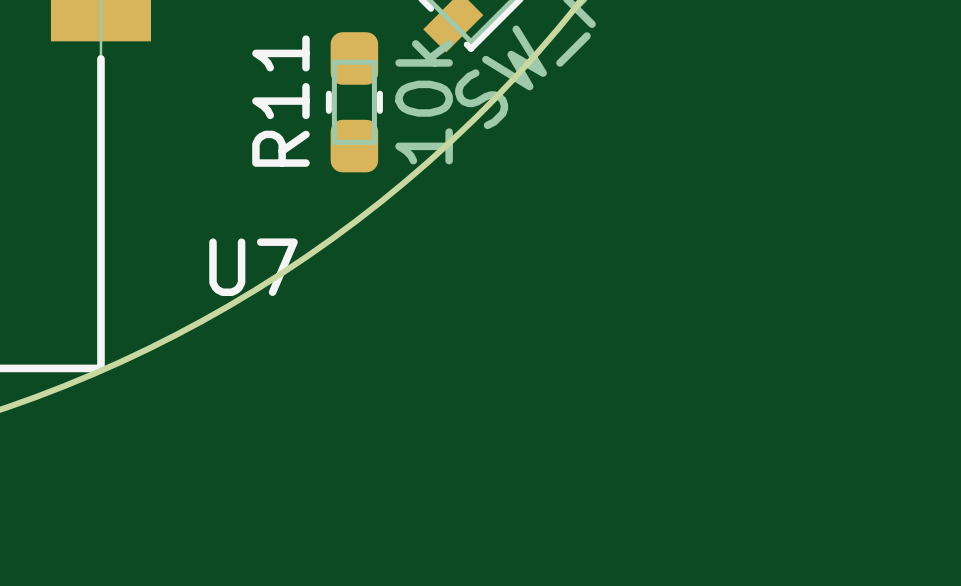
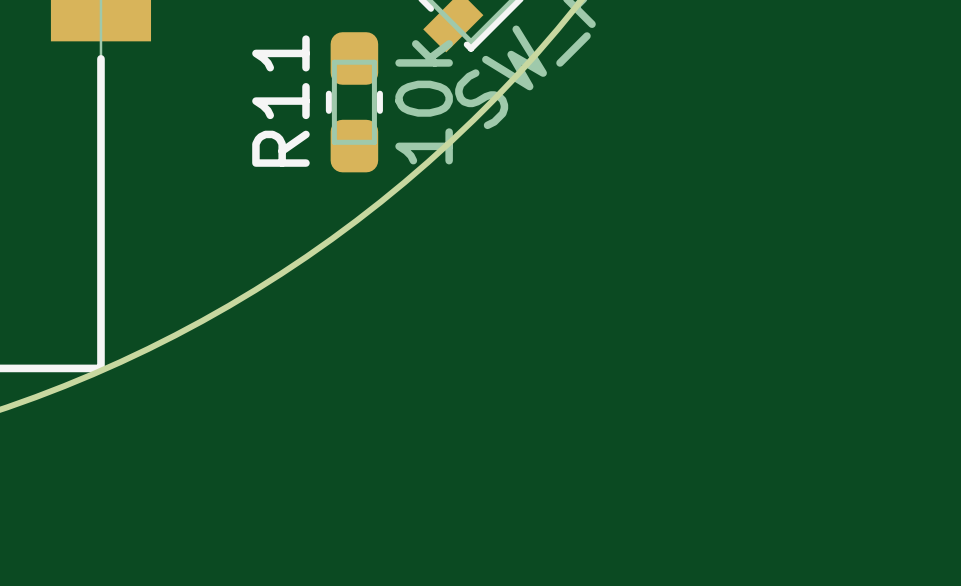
U7 name: U7 (253, 267) -> none

